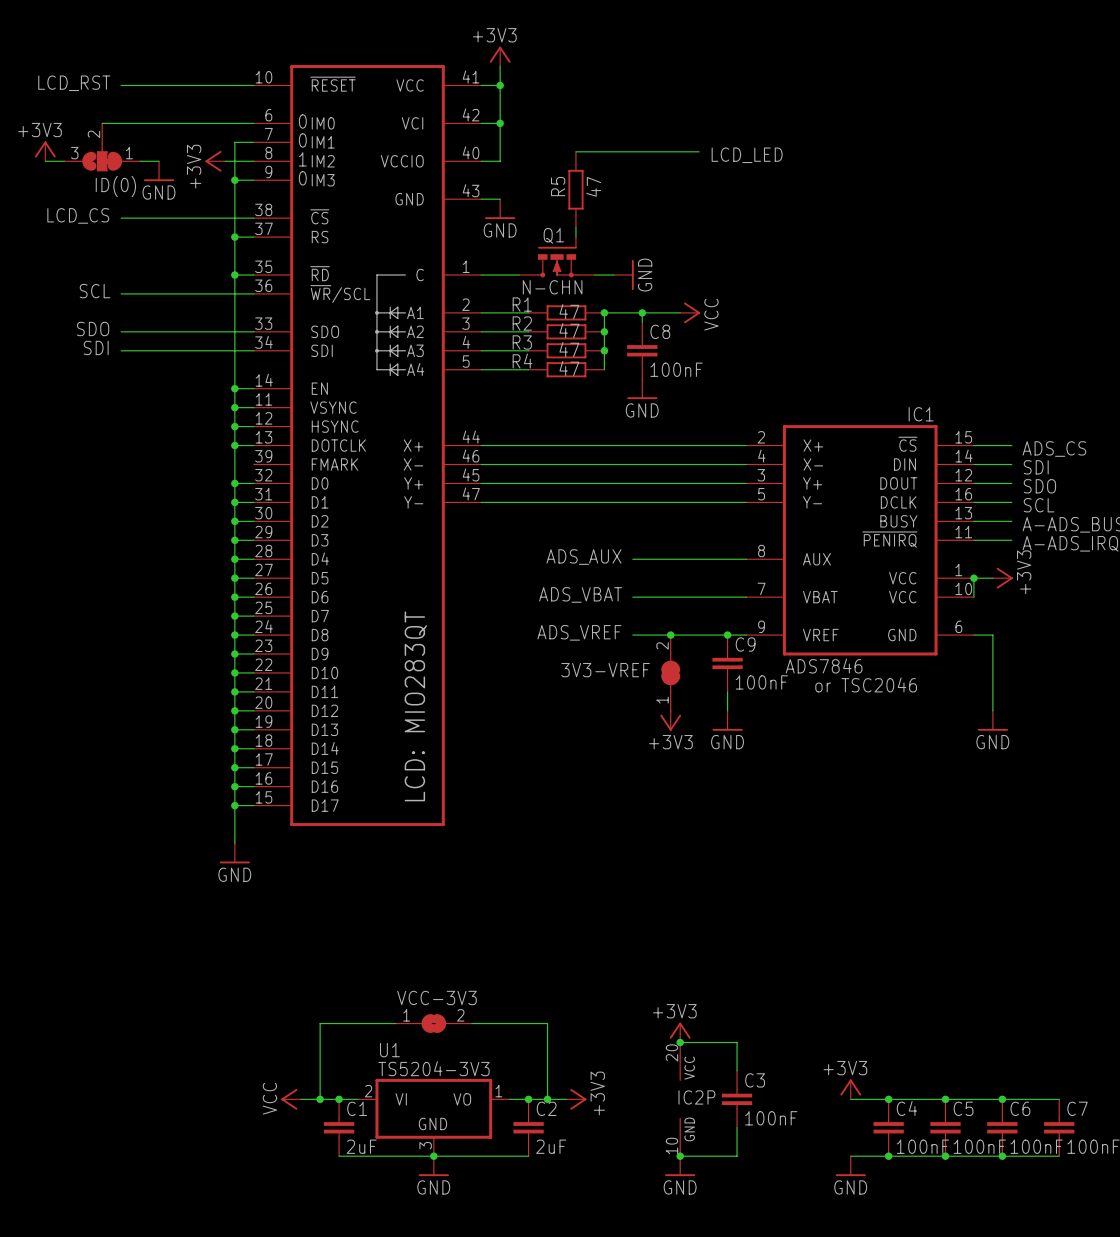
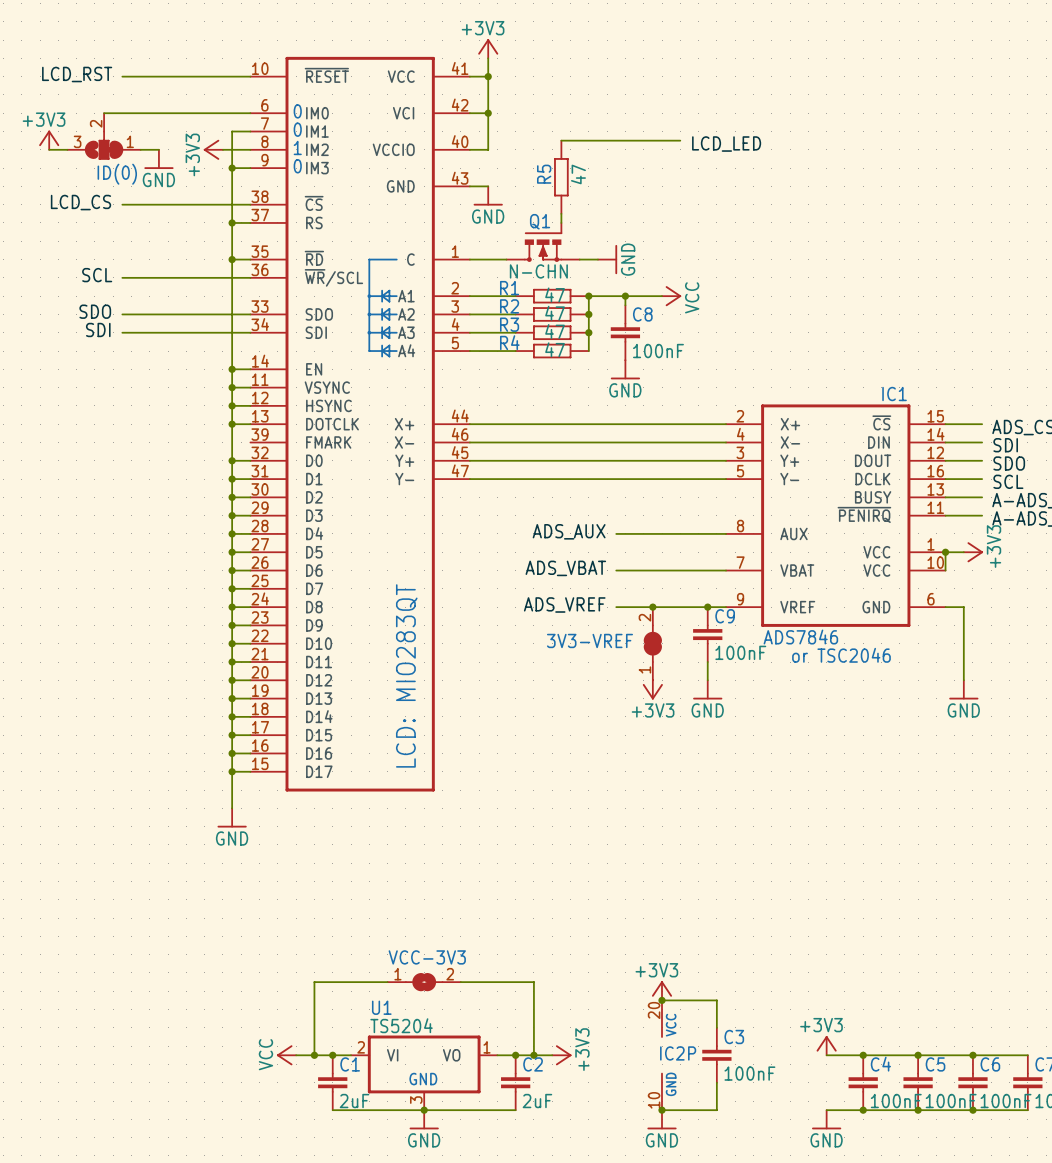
U1 value: TS5204-3V3 (433, 1068) -> TS5204 (401, 1025)

